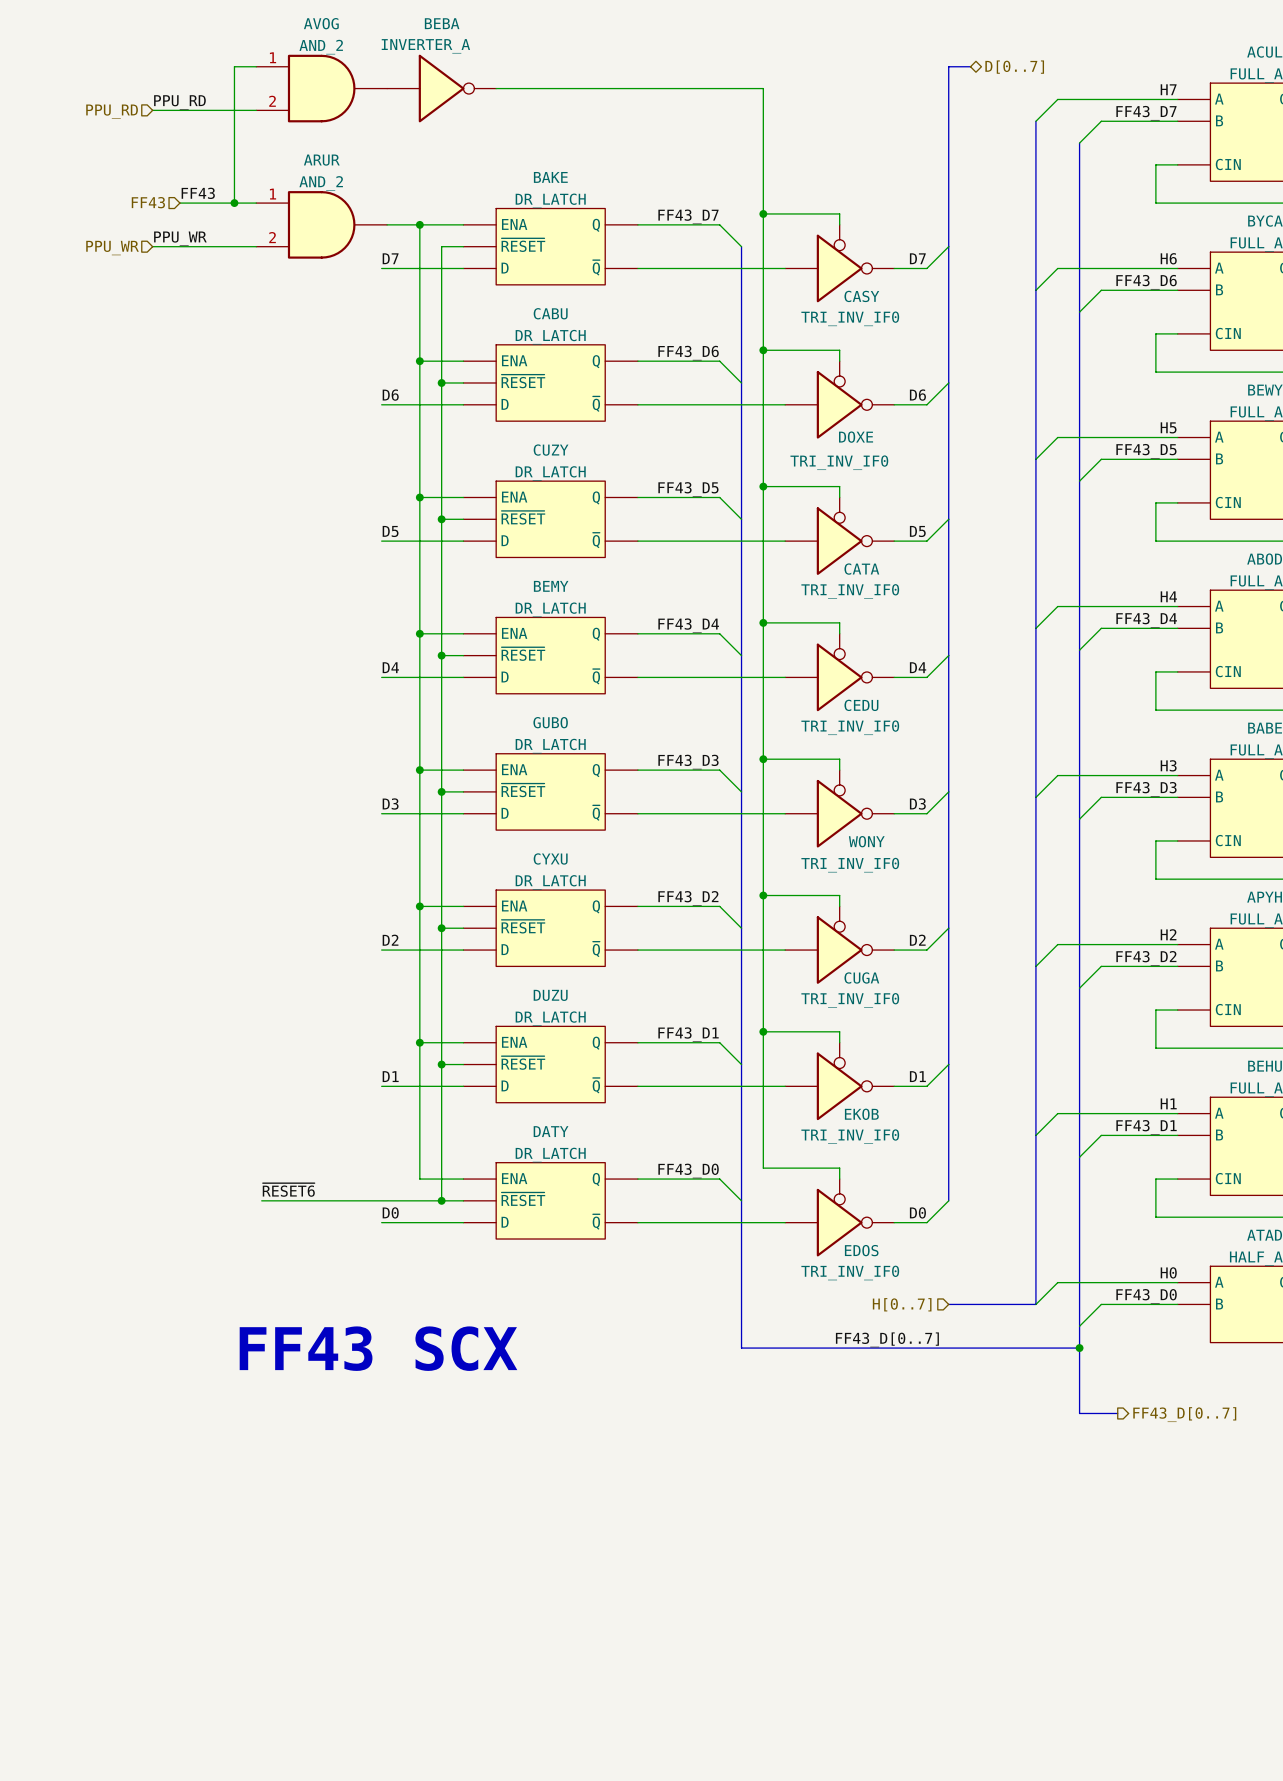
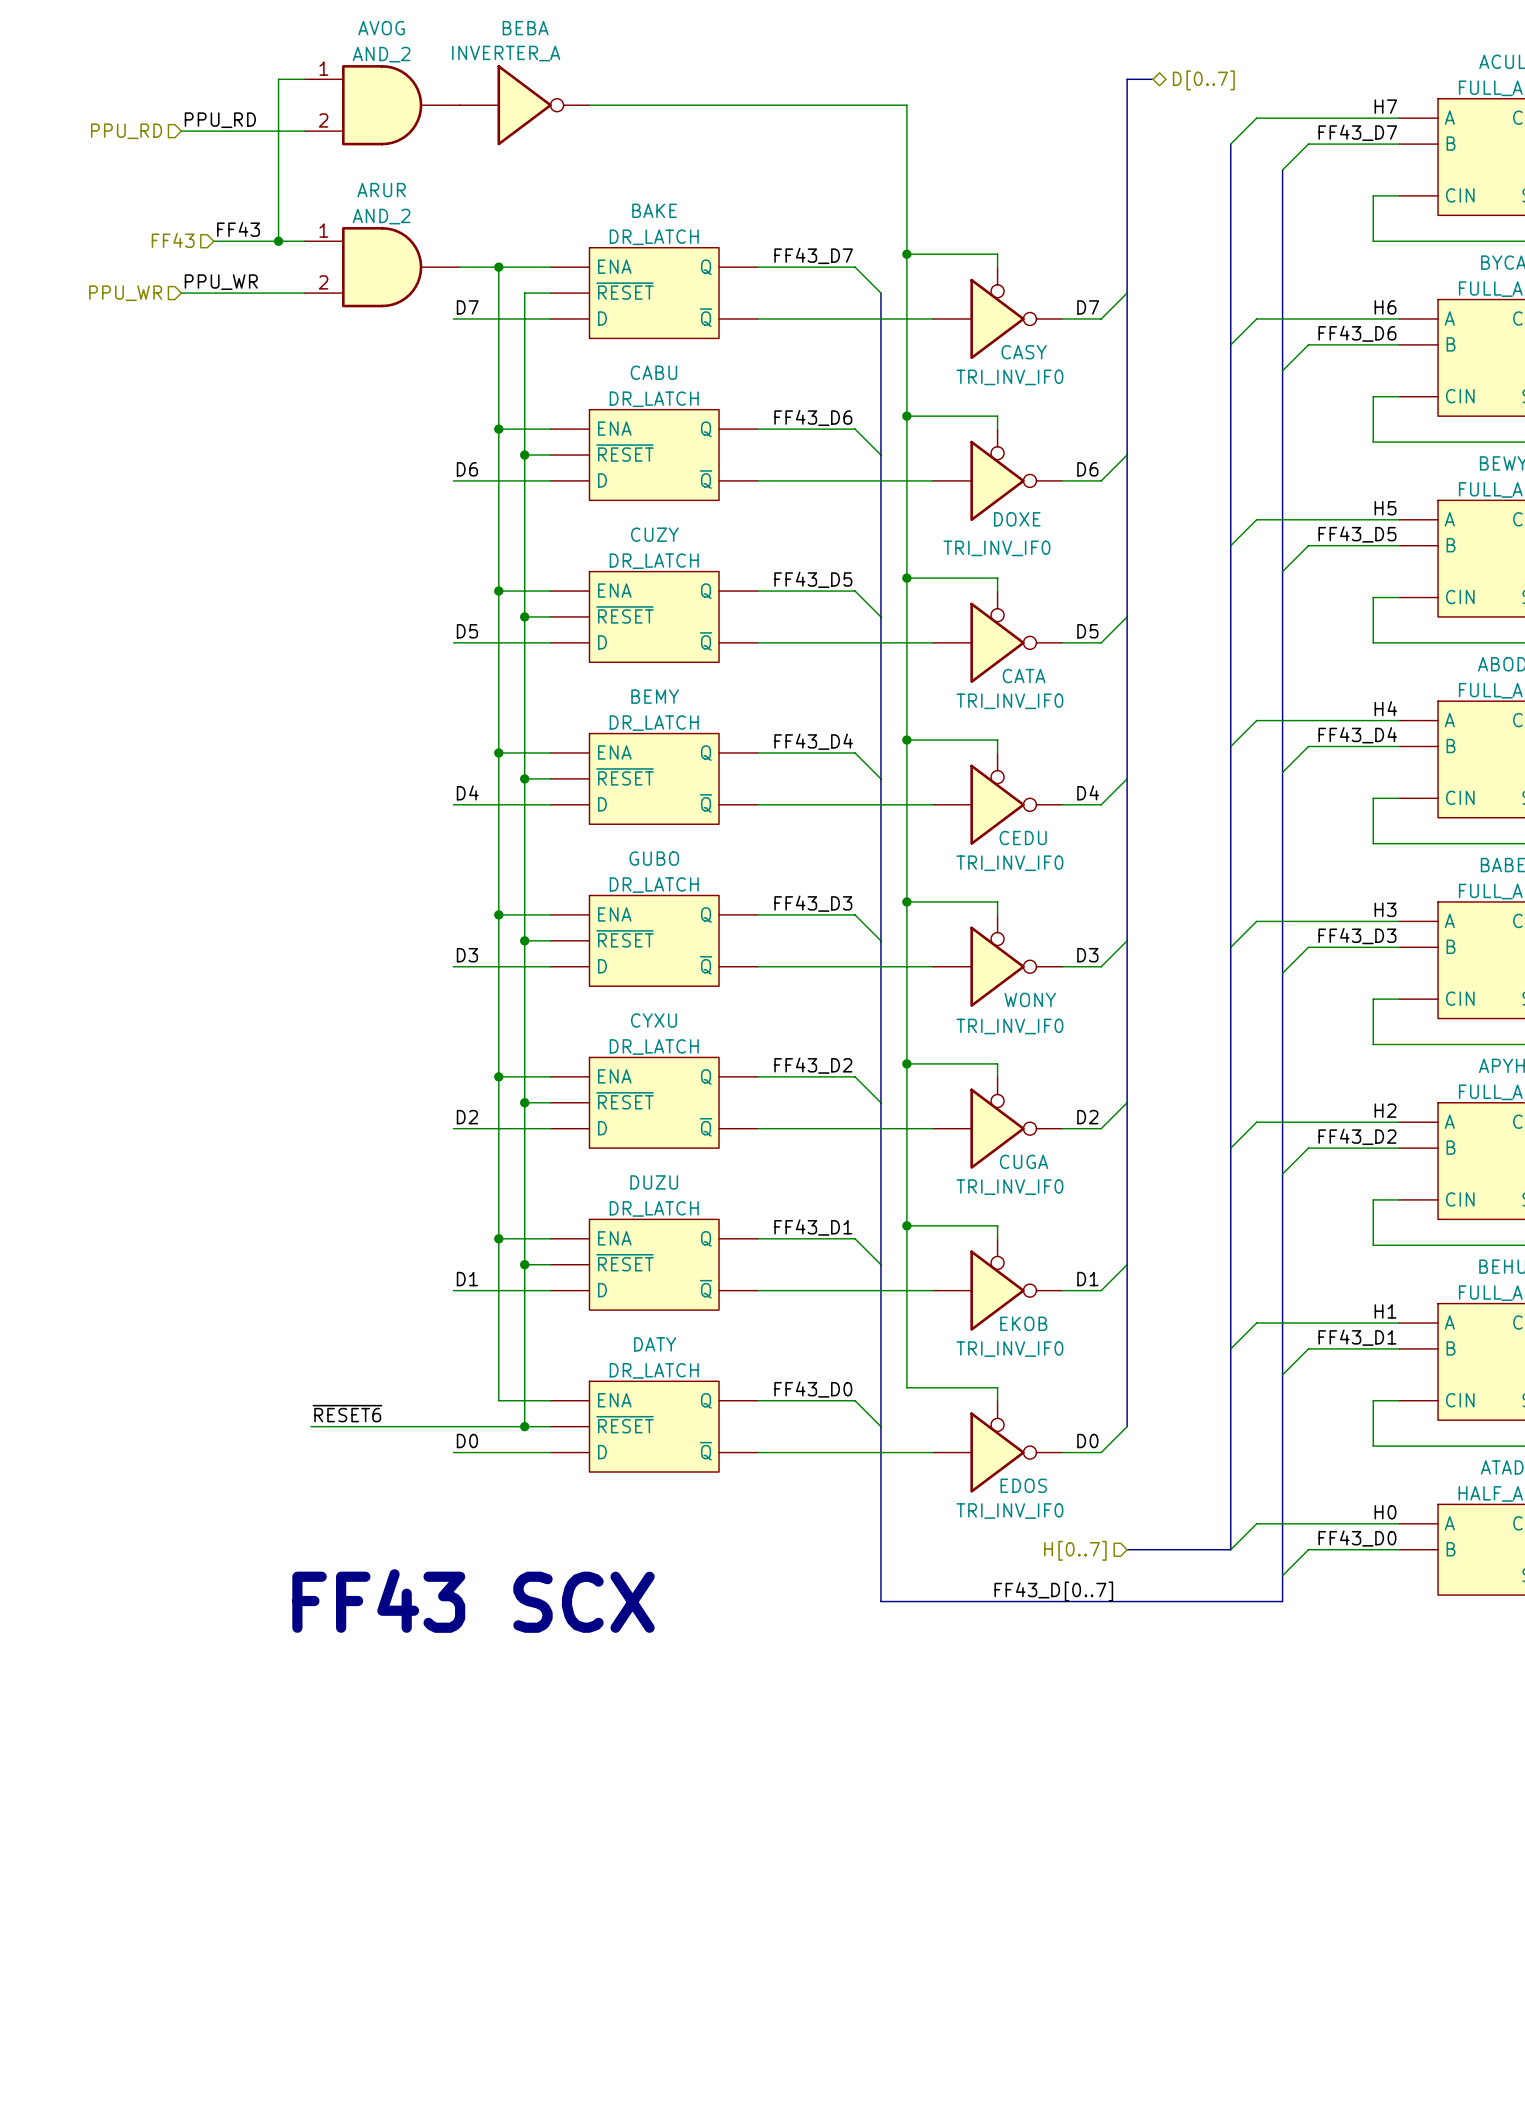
bus: (1079, 1348) (1079, 1413) (1117, 1413) -> none
junction: (1079, 1348) -> none
hierarchical label: FF43_D[0..7] (1184, 1414) -> none

